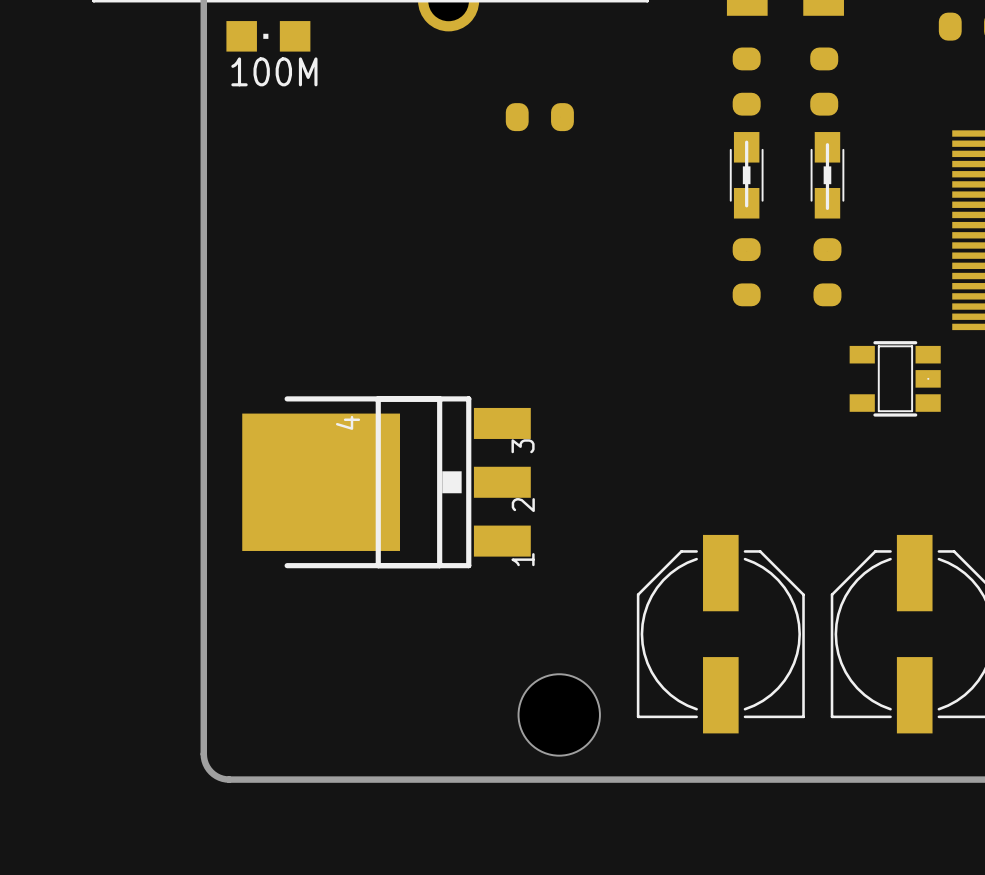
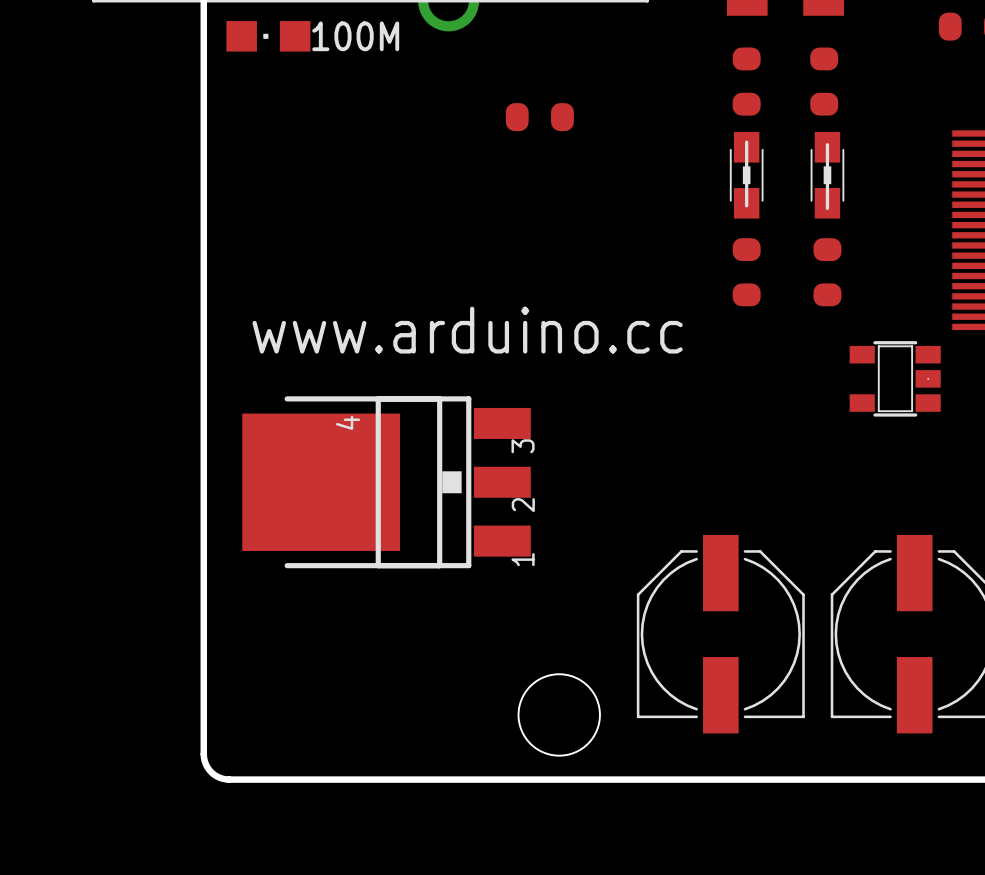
100M name position: 100M (274, 71) -> 100M (355, 36)
text: none -> www.arduino.cc (467, 330)

